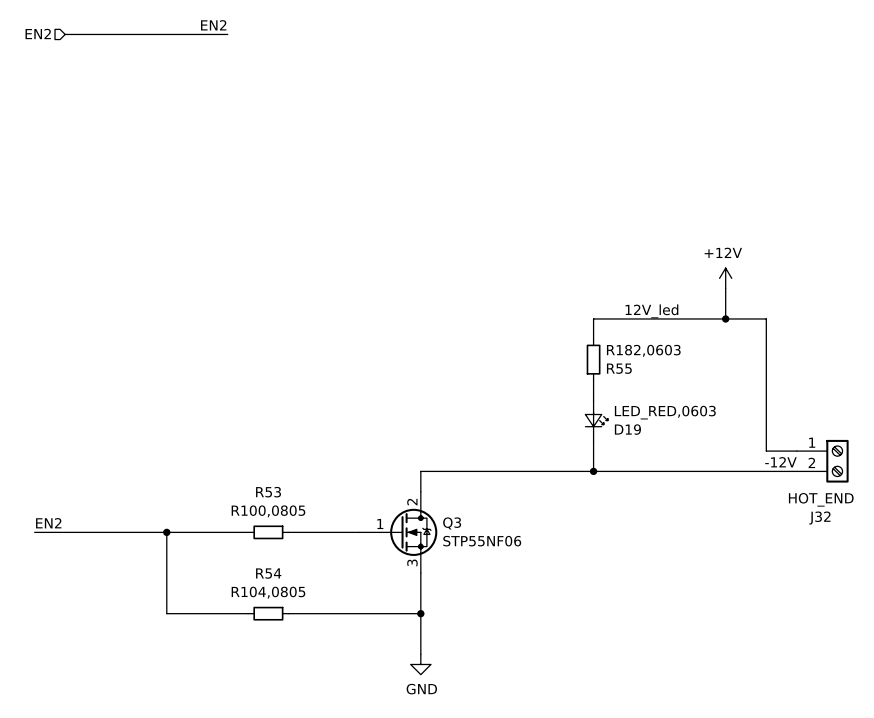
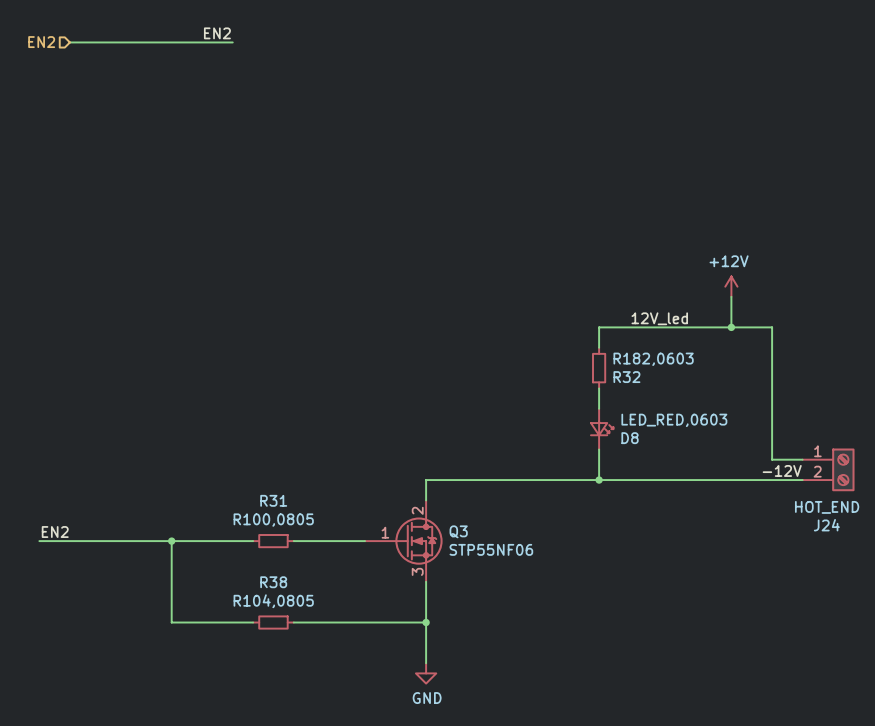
R55 name: R55 (619, 368) -> R32 (626, 377)
D19 name: D19 (627, 429) -> D8 (630, 438)
R53 name: R53 (268, 492) -> R31 (273, 500)
J32 name: J32 (819, 518) -> J24 (826, 525)
R54 name: R54 (268, 573) -> R38 (273, 582)

